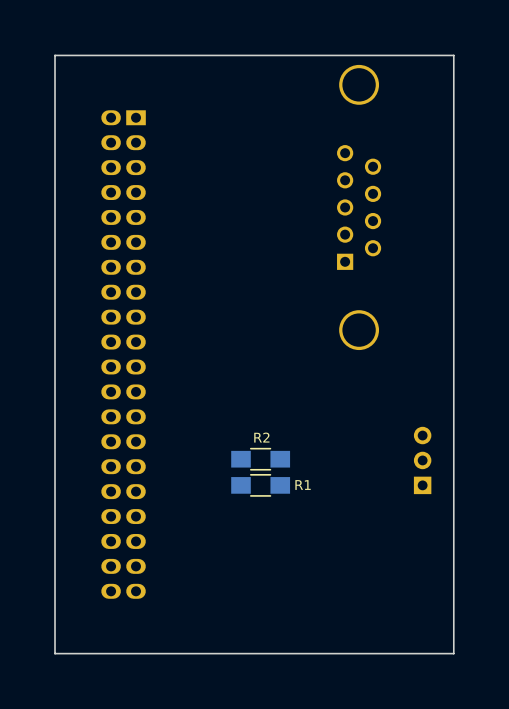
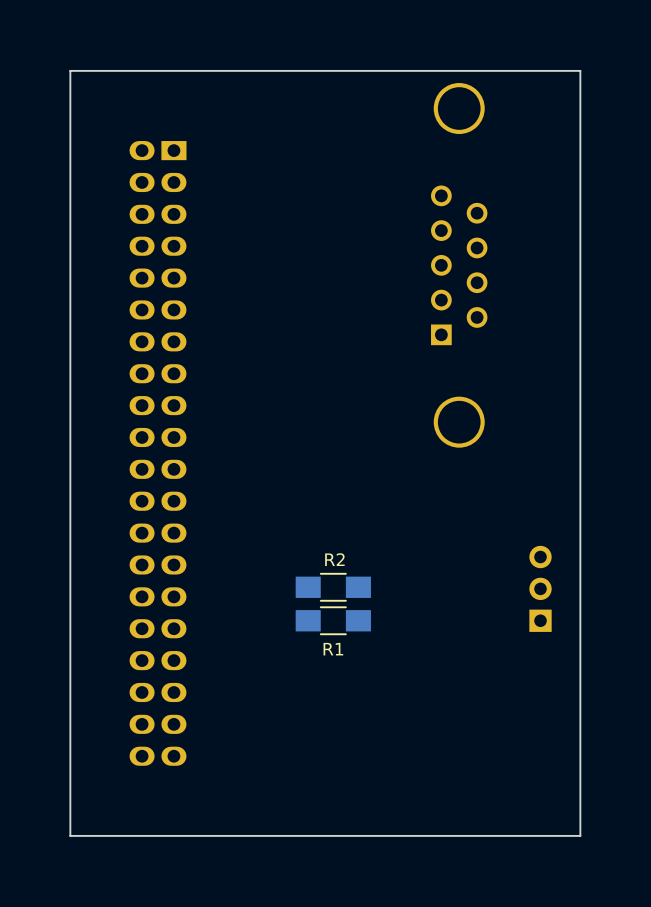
R1 name position: R1 (303, 485) -> R1 (333, 649)

